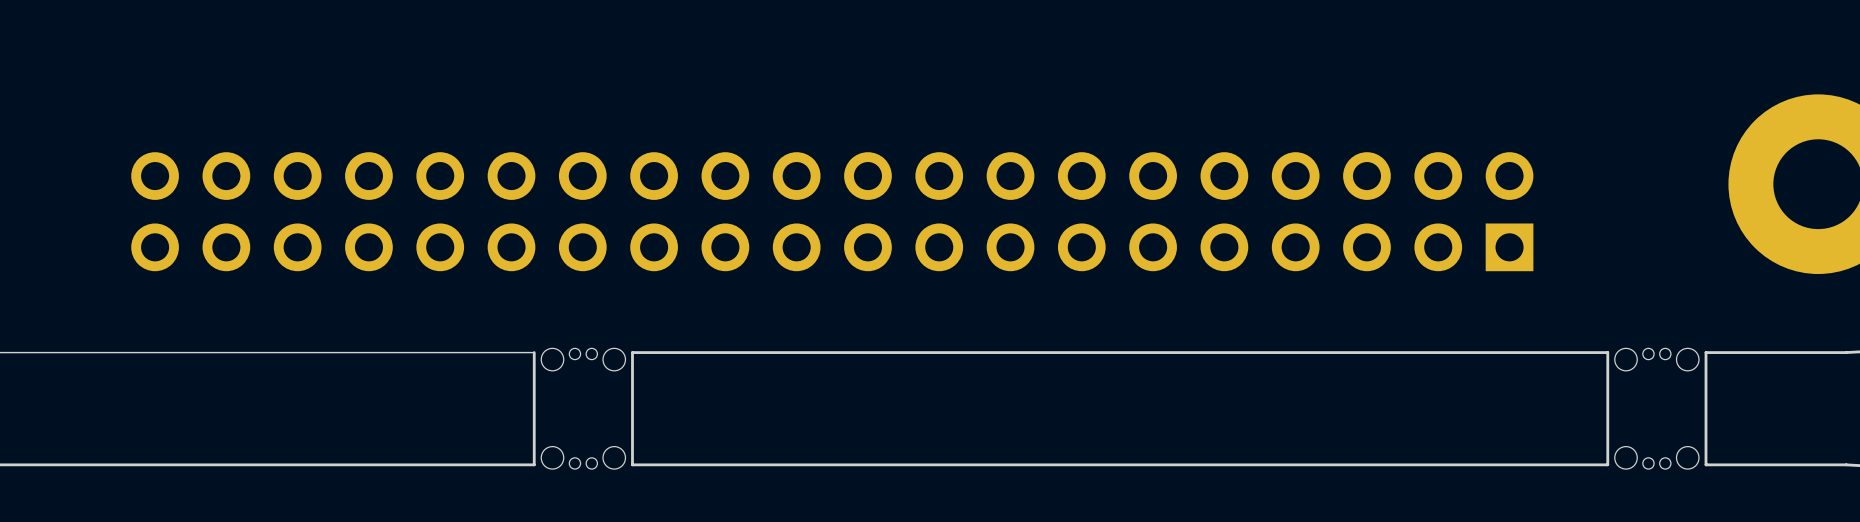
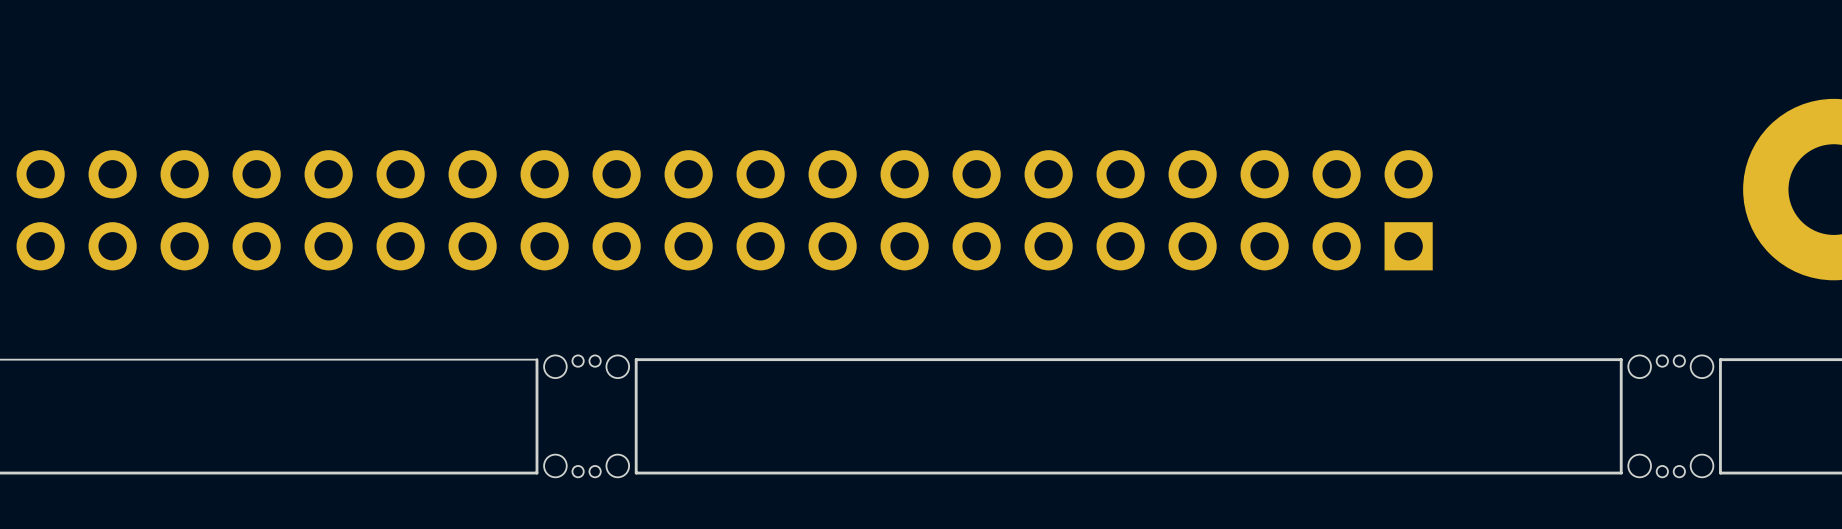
part position: (832, 211) -> (724, 210)

